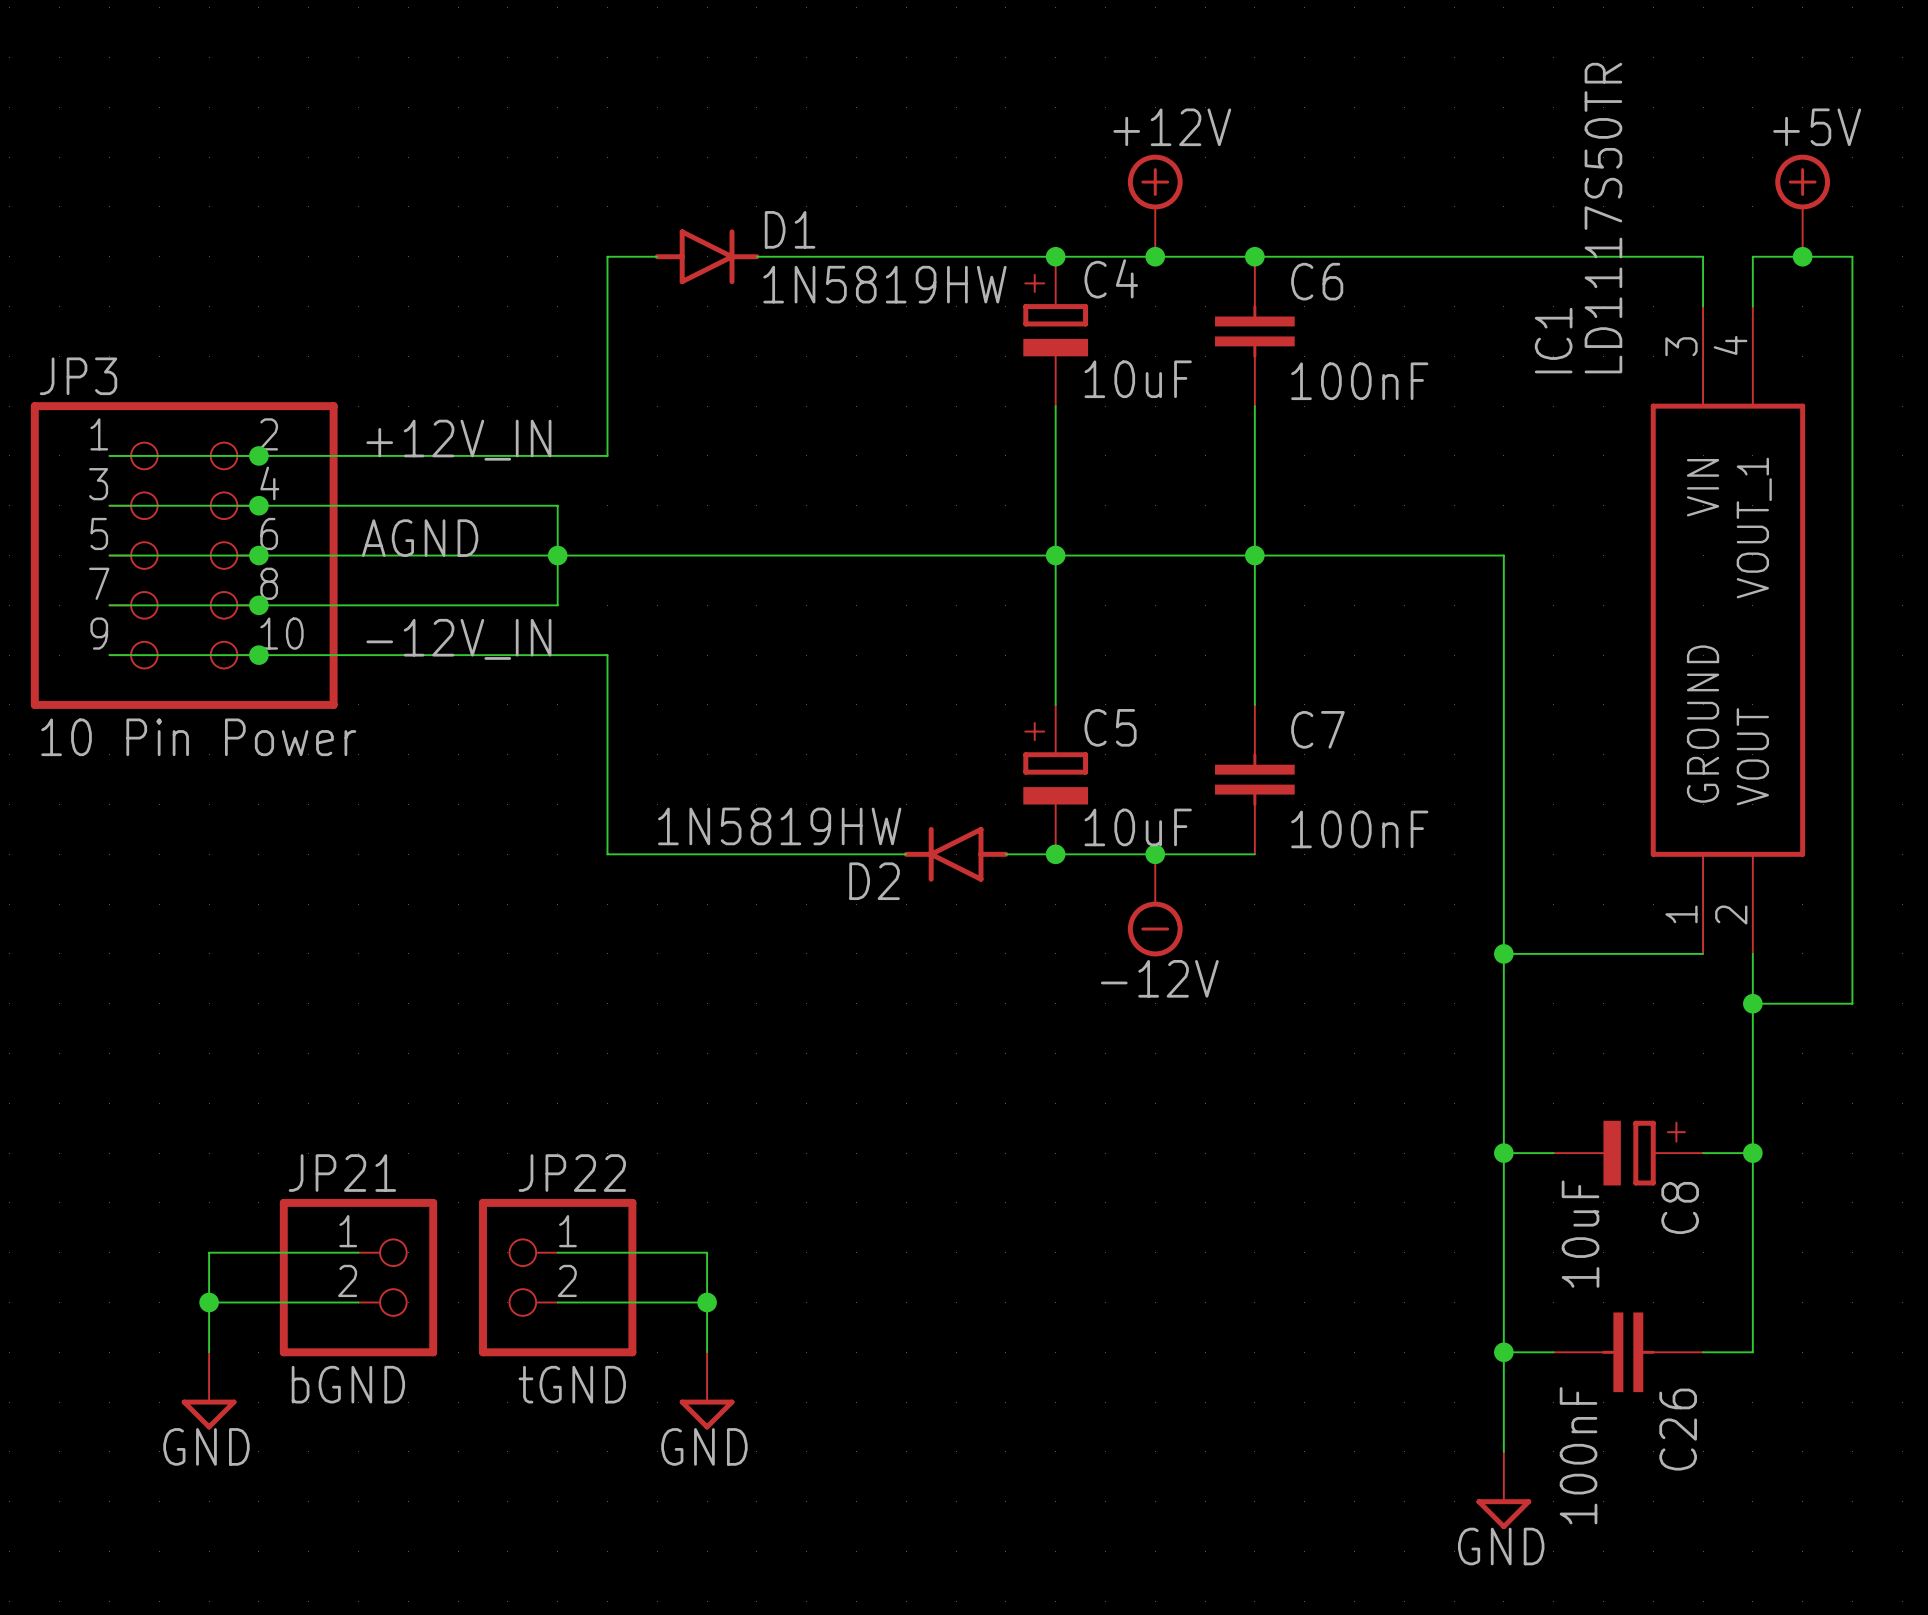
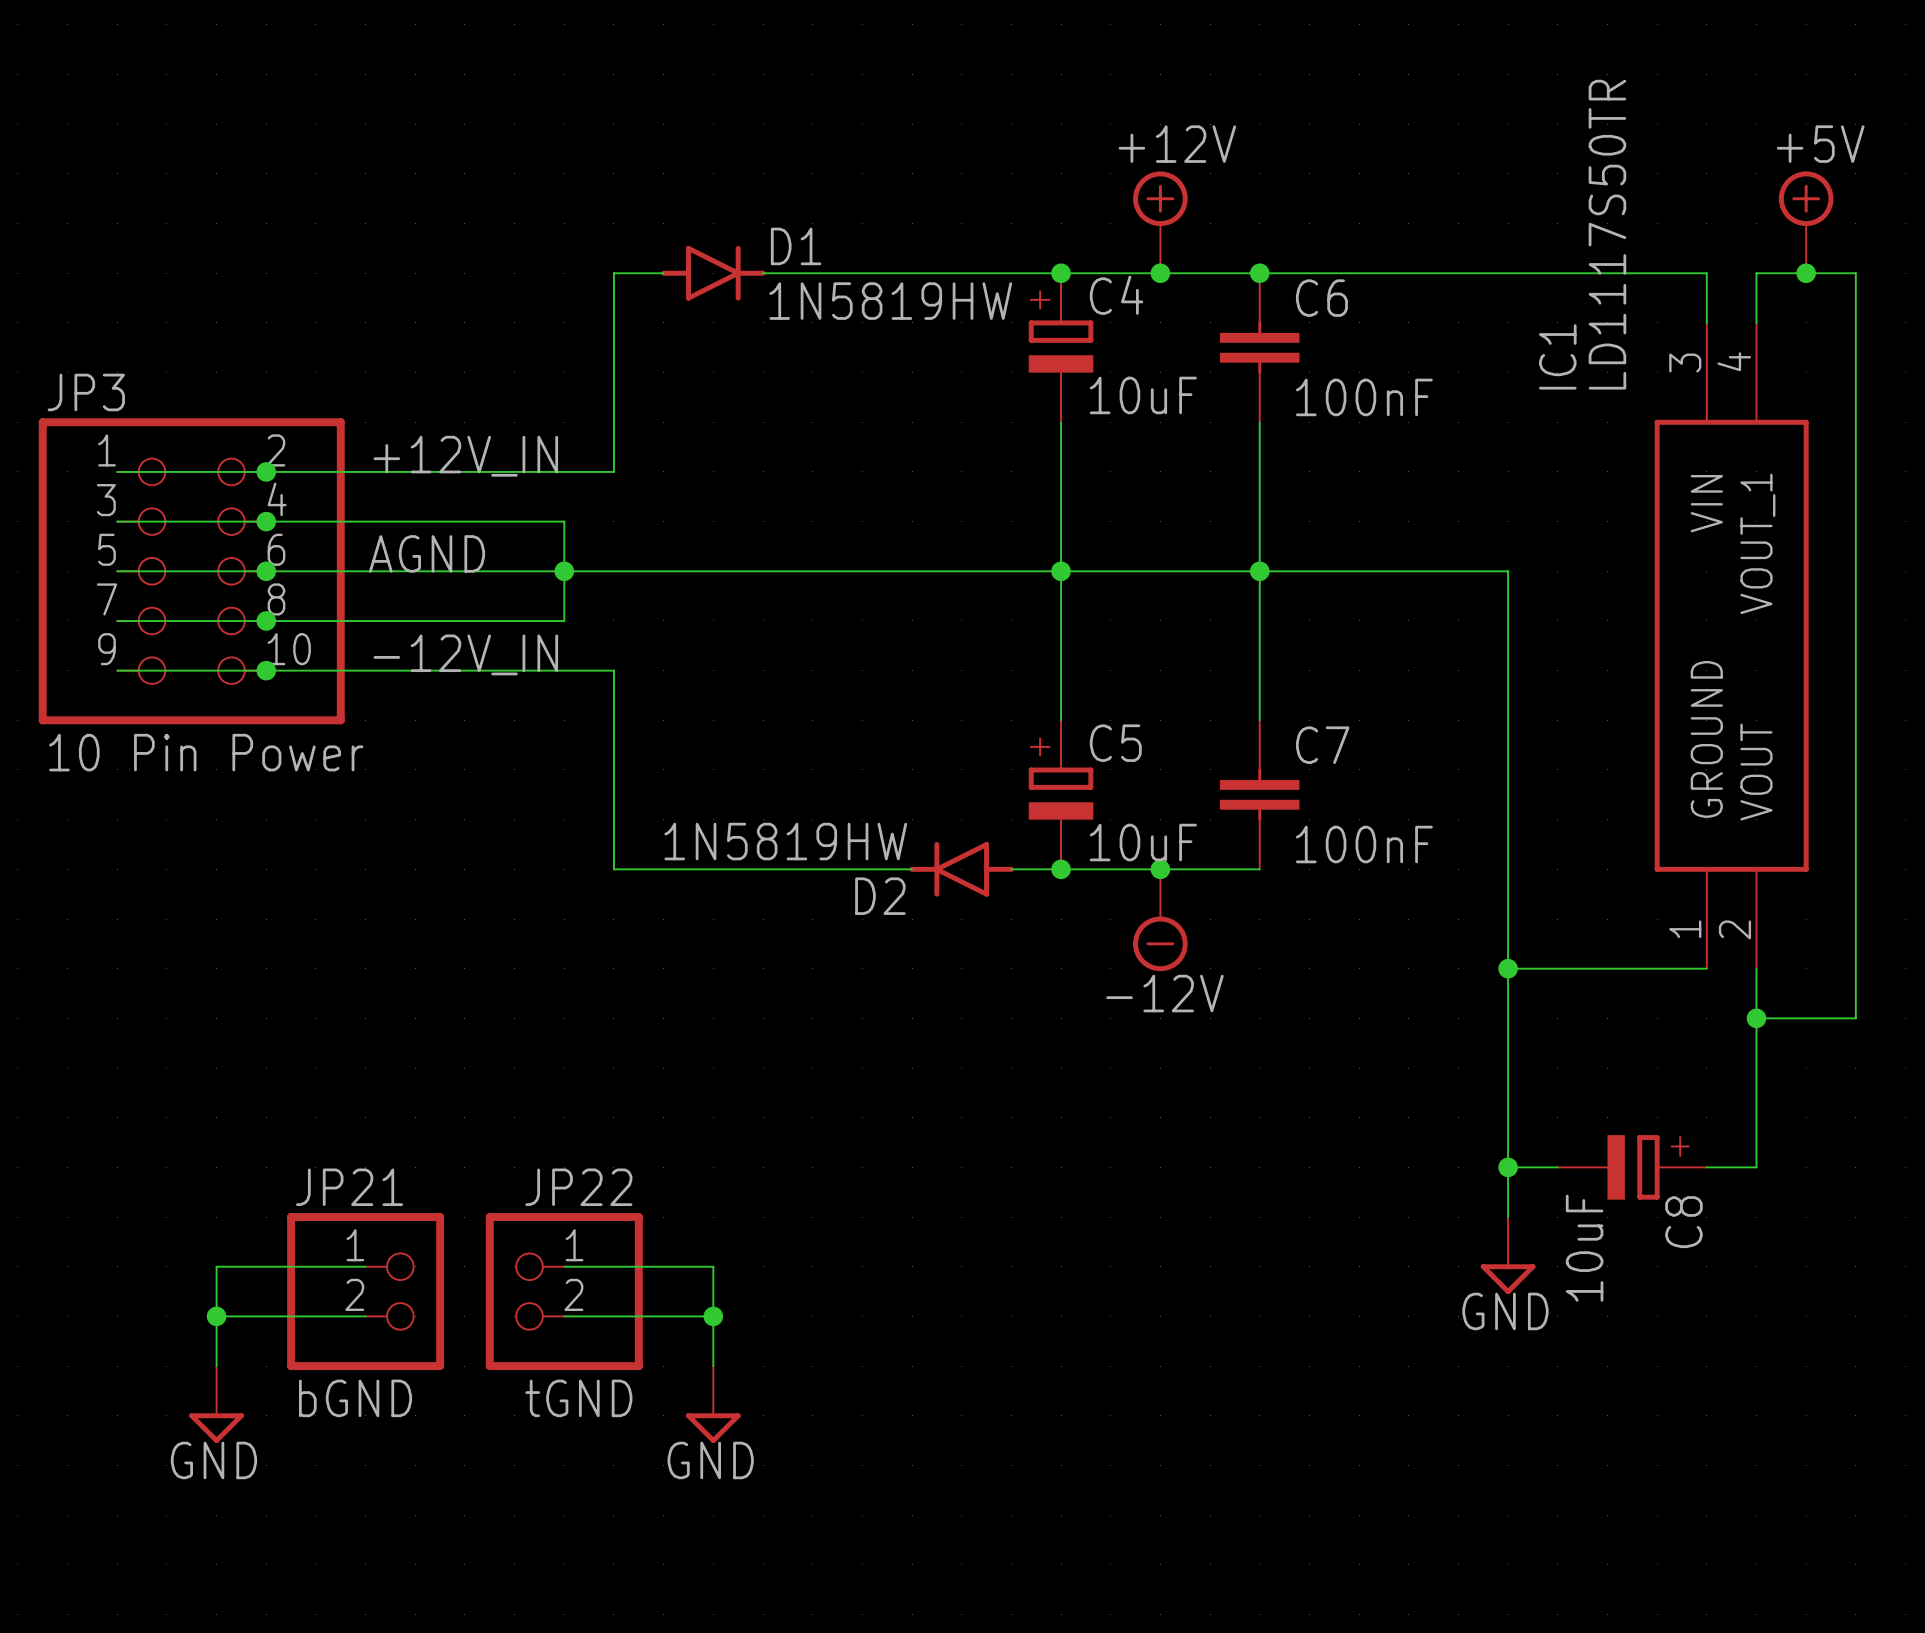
wire: (1752, 1153) (1752, 1352) (1703, 1352) -> none
junction: (1752, 1153) -> none
wire: (1503, 1202) (1503, 1451) -> none
wire: (1503, 1352) (1553, 1352) -> none
junction: (1503, 1352) -> none
C26: 100nF (1628, 1352) -> none
power symbol position: GND (1503, 1490) -> GND (1508, 1255)

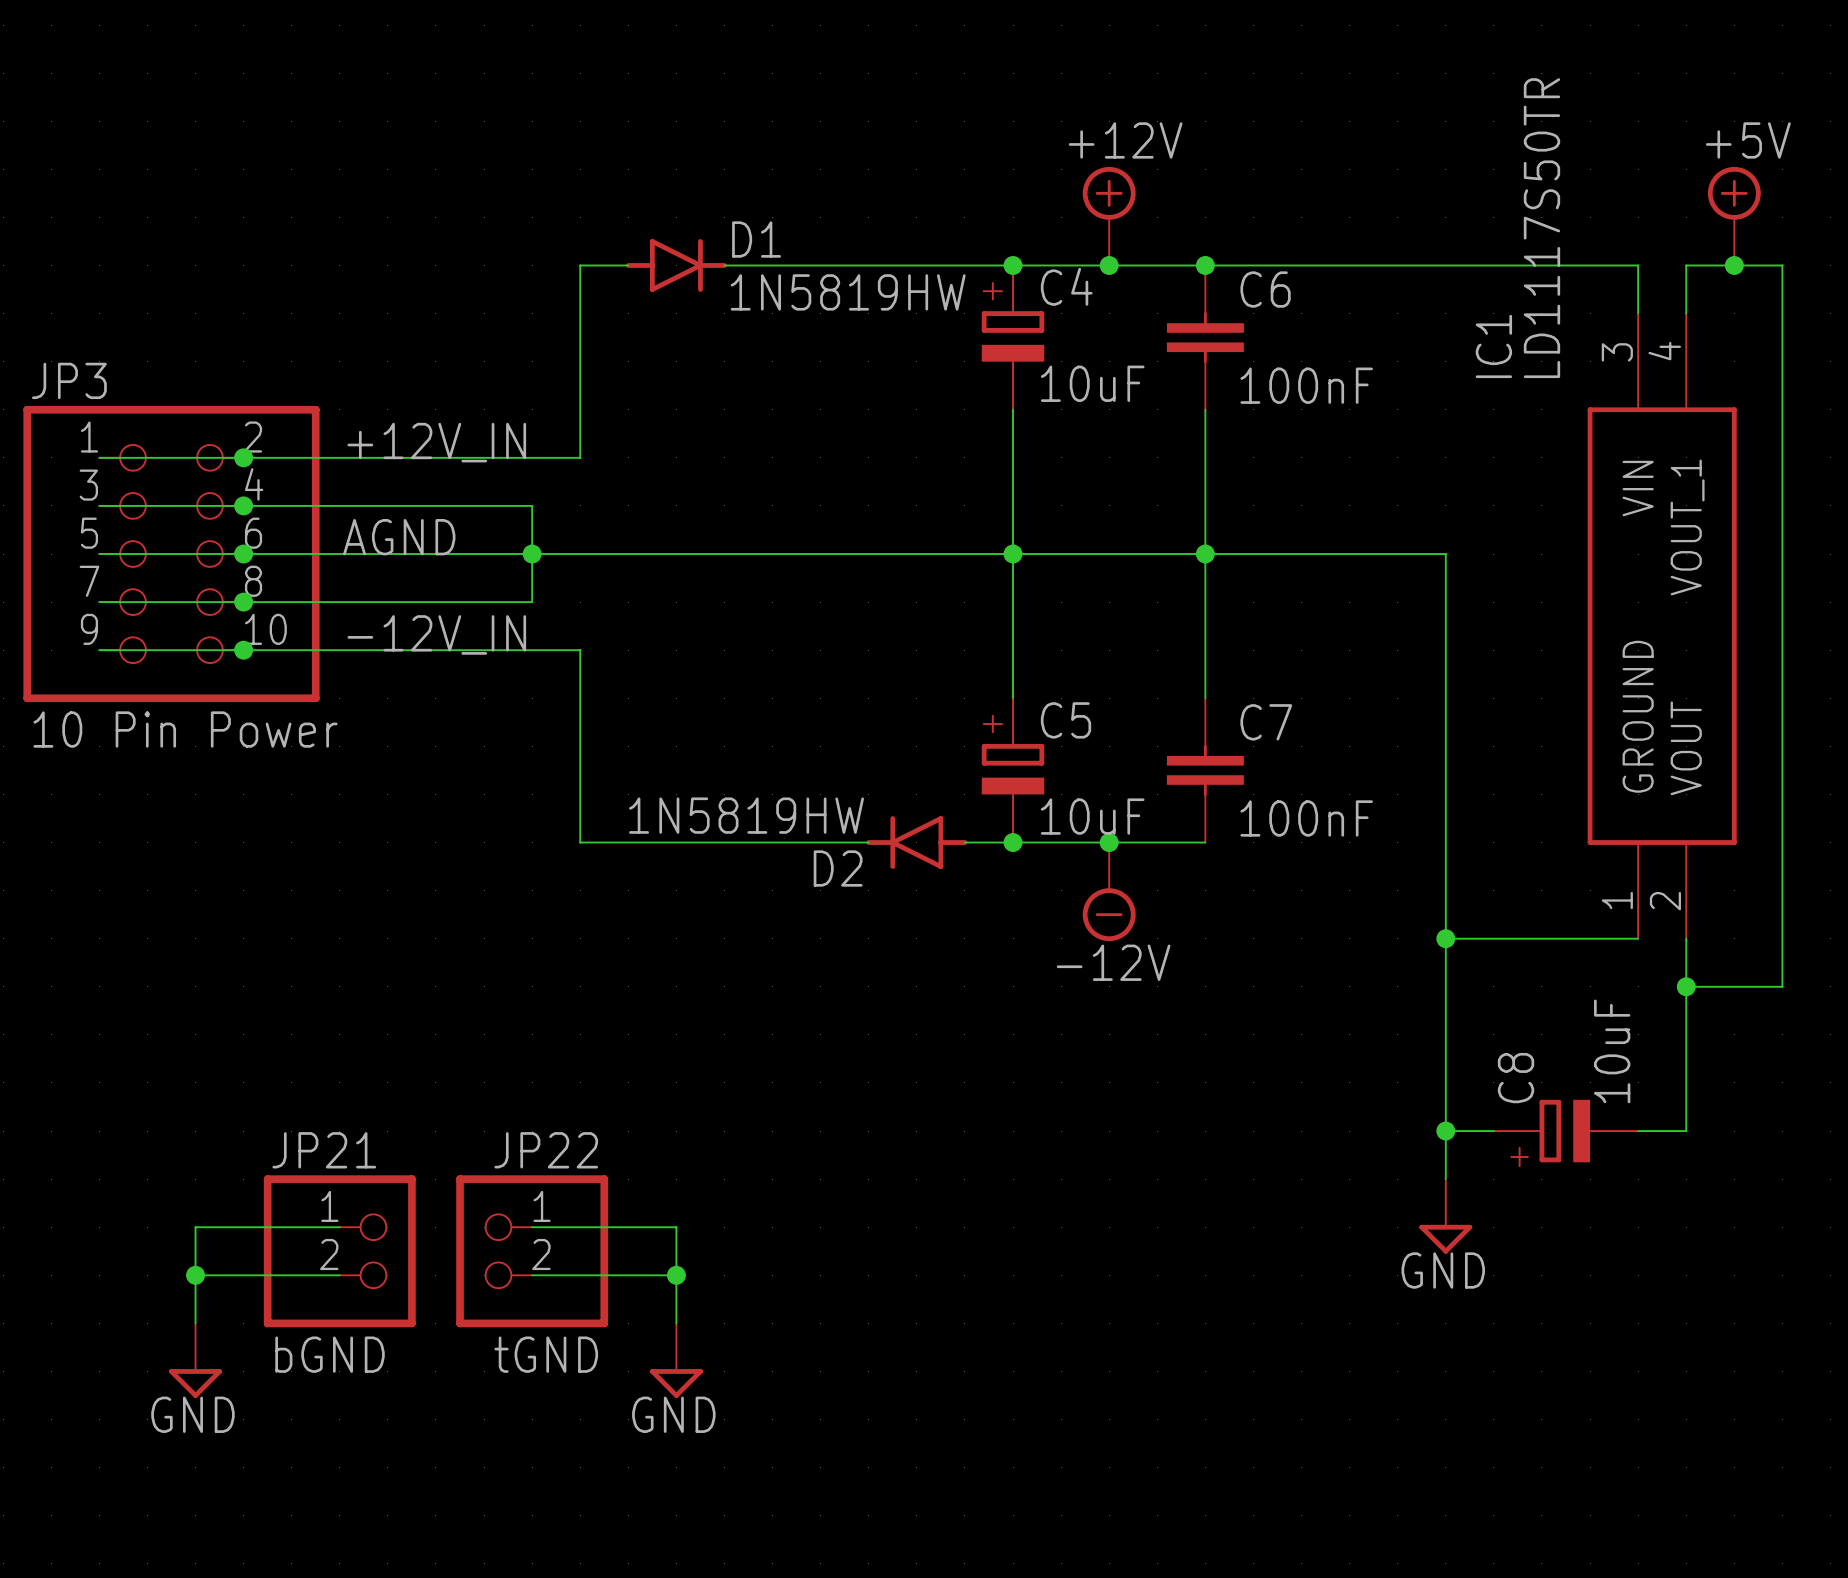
C8 symbol: [1557, 1135, 1707, 1200] -> [1493, 1099, 1639, 1163]
C8 name position: C8 (1683, 1222) -> C8 (1516, 1078)
C8 value position: 10uF (1584, 1248) -> 10uF (1612, 1051)

